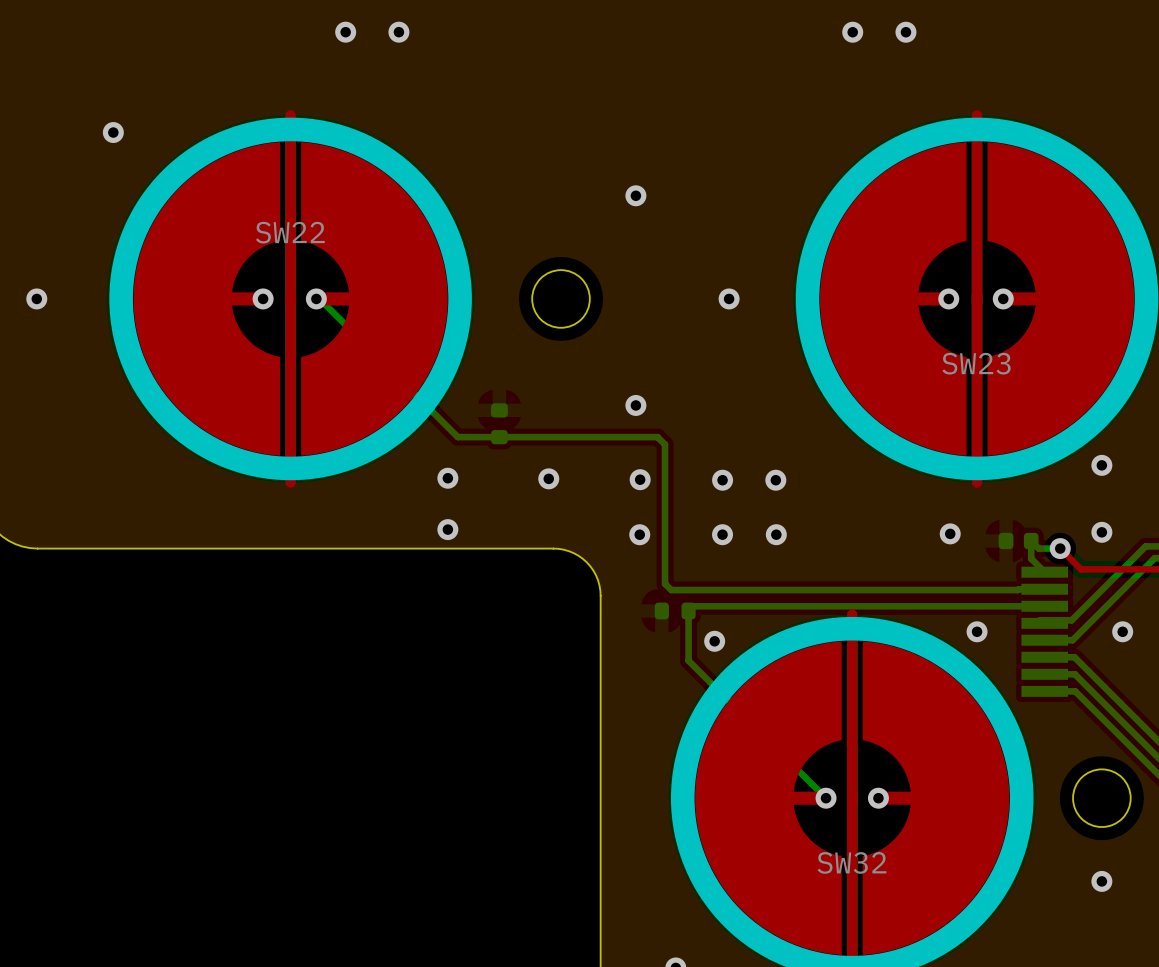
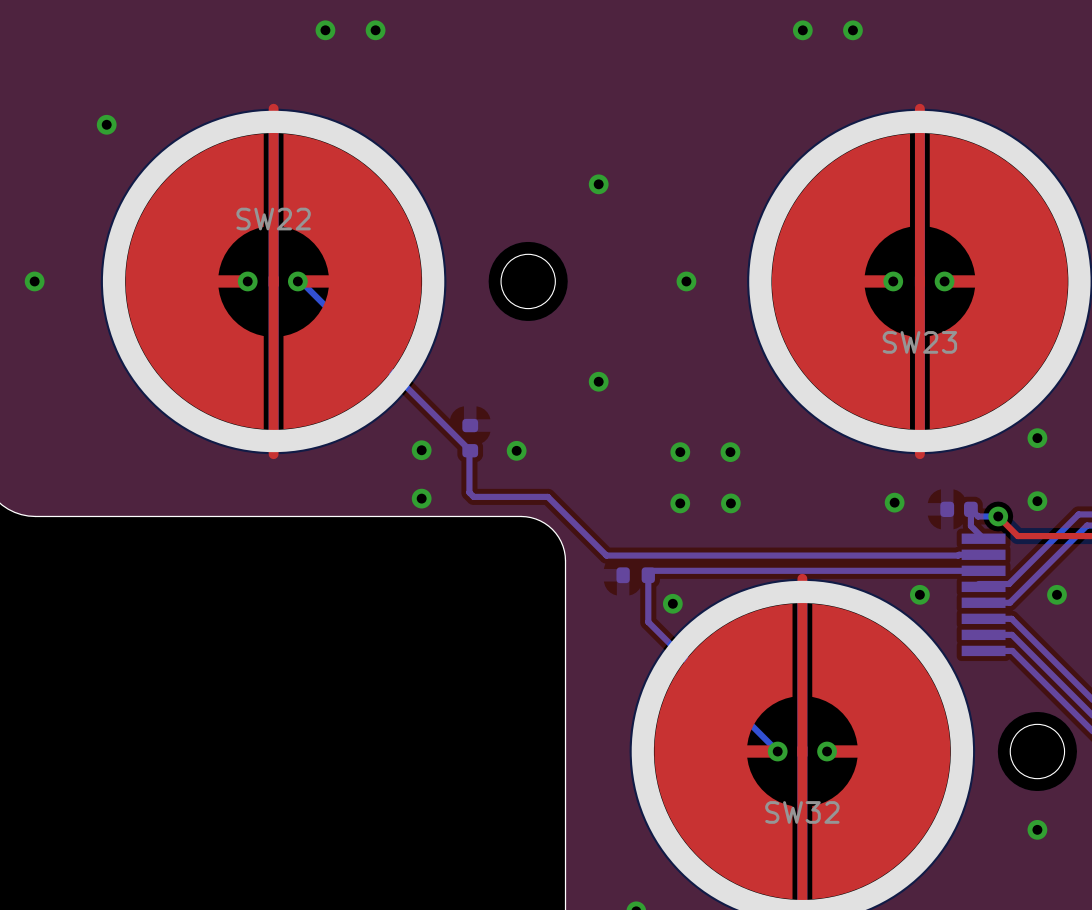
part position: (499, 423) -> (470, 438)
bottom track: (457, 437) (657, 437) (665, 444) (665, 583) (671, 590) -> (431, 411) (470, 450) (469, 492) (473, 496) (547, 496) (606, 555) (632, 555)
via: (640, 479) -> none
via: (639, 534) -> none

